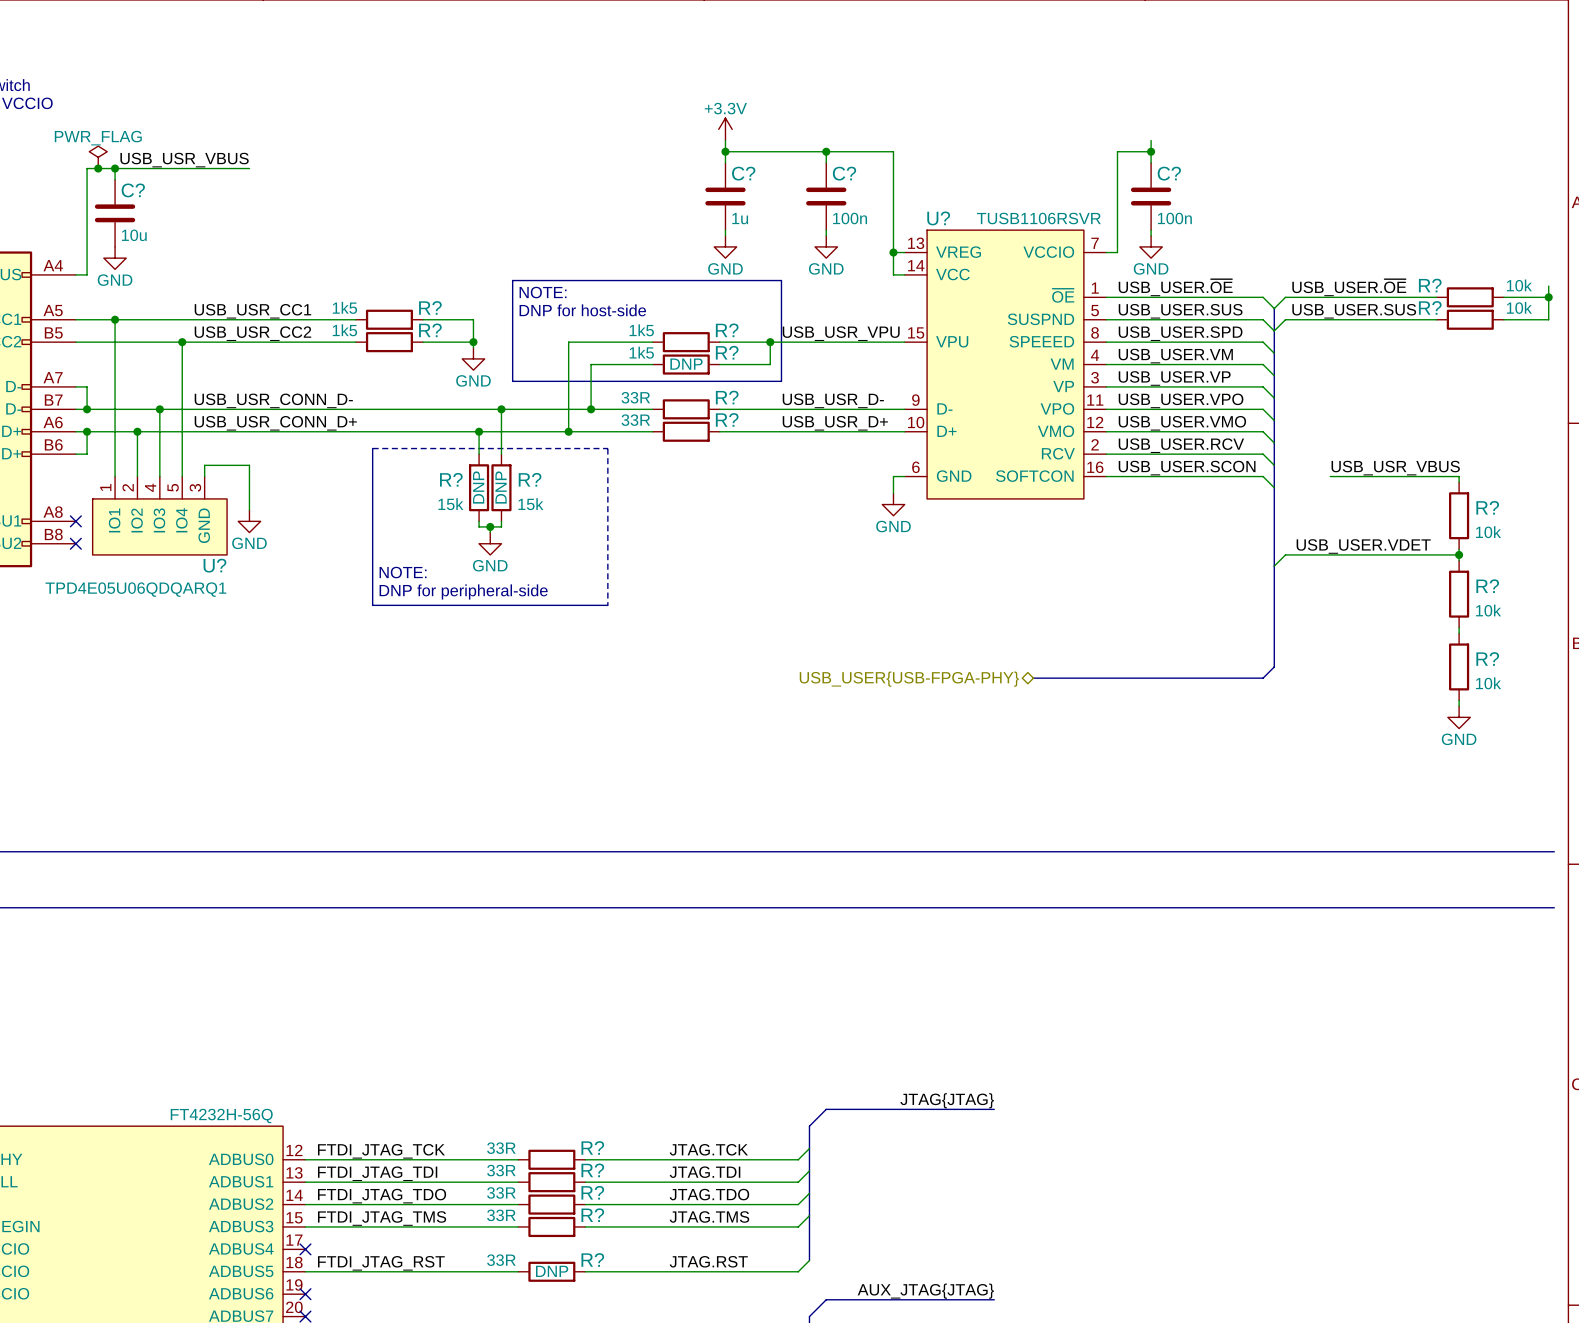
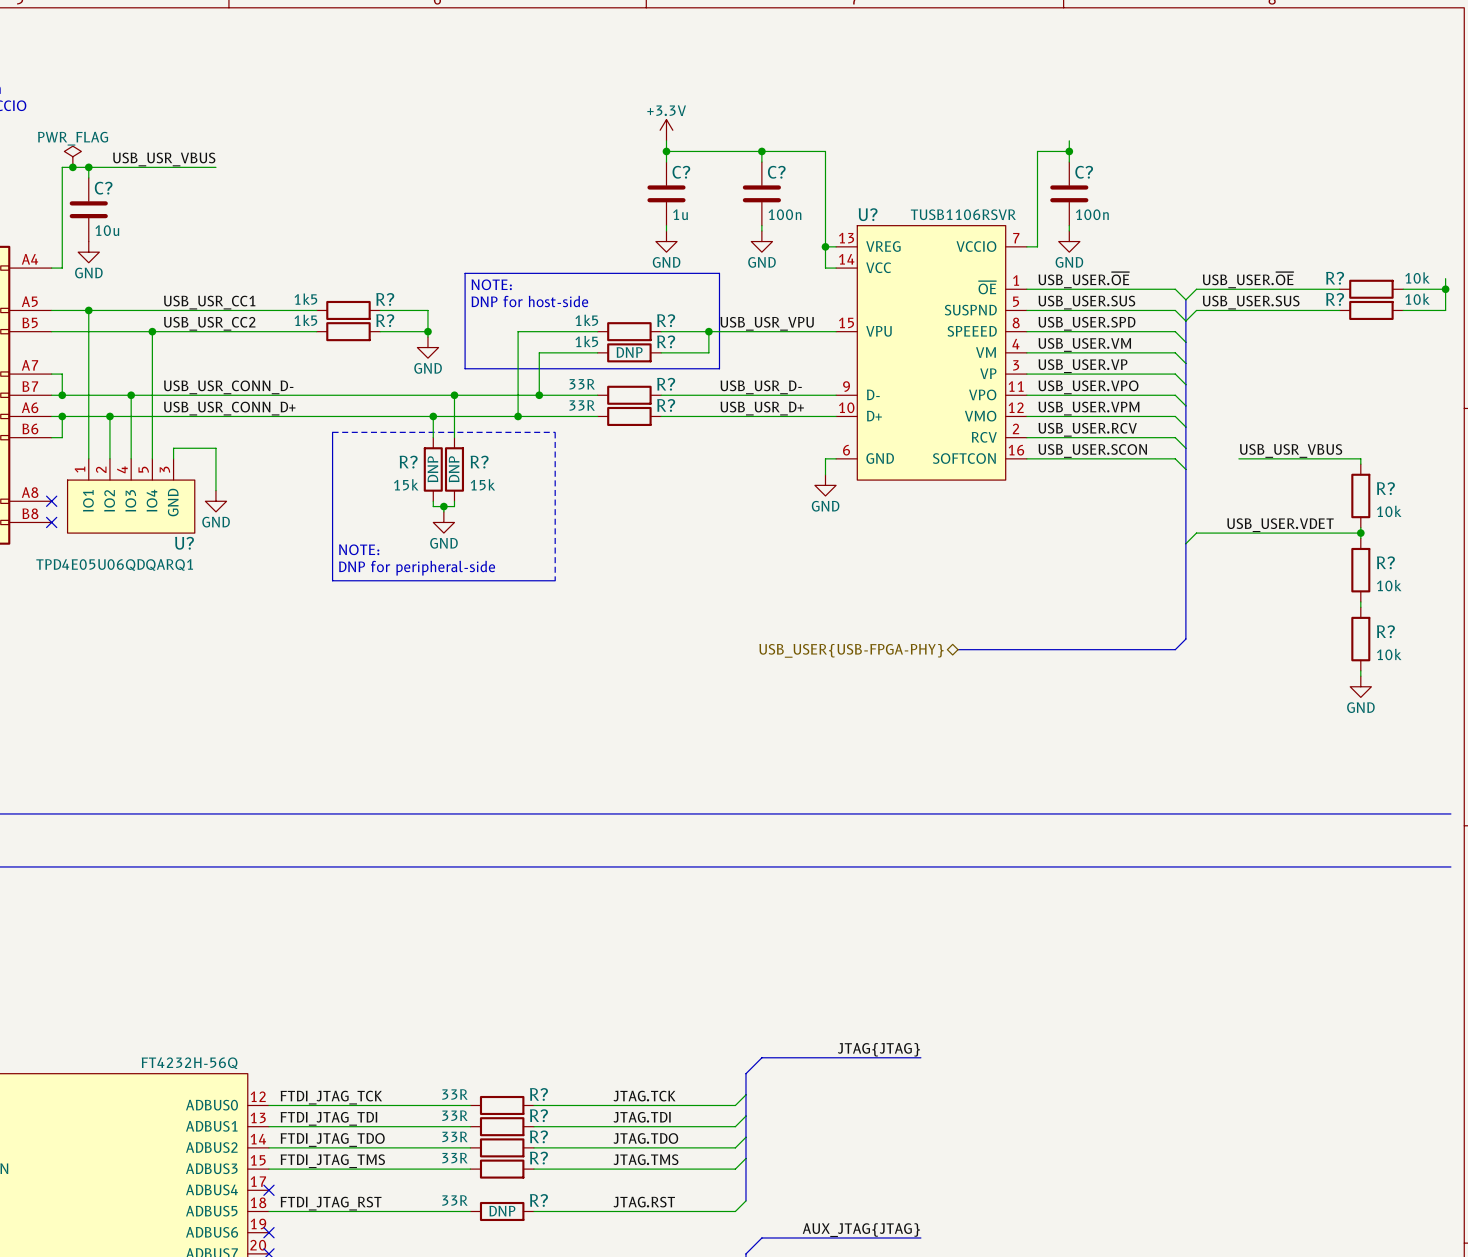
label: USB_USER.VMO (1182, 423) -> USB_USER.VPM (1088, 408)

